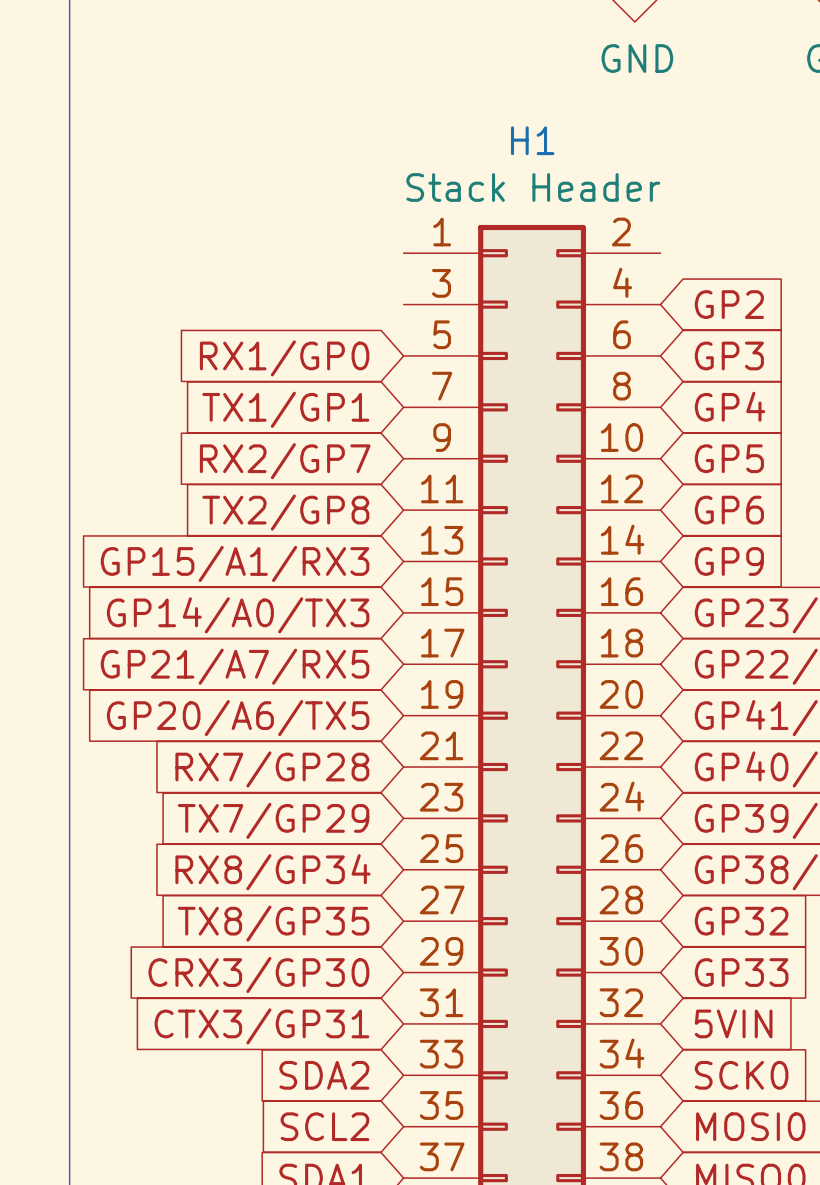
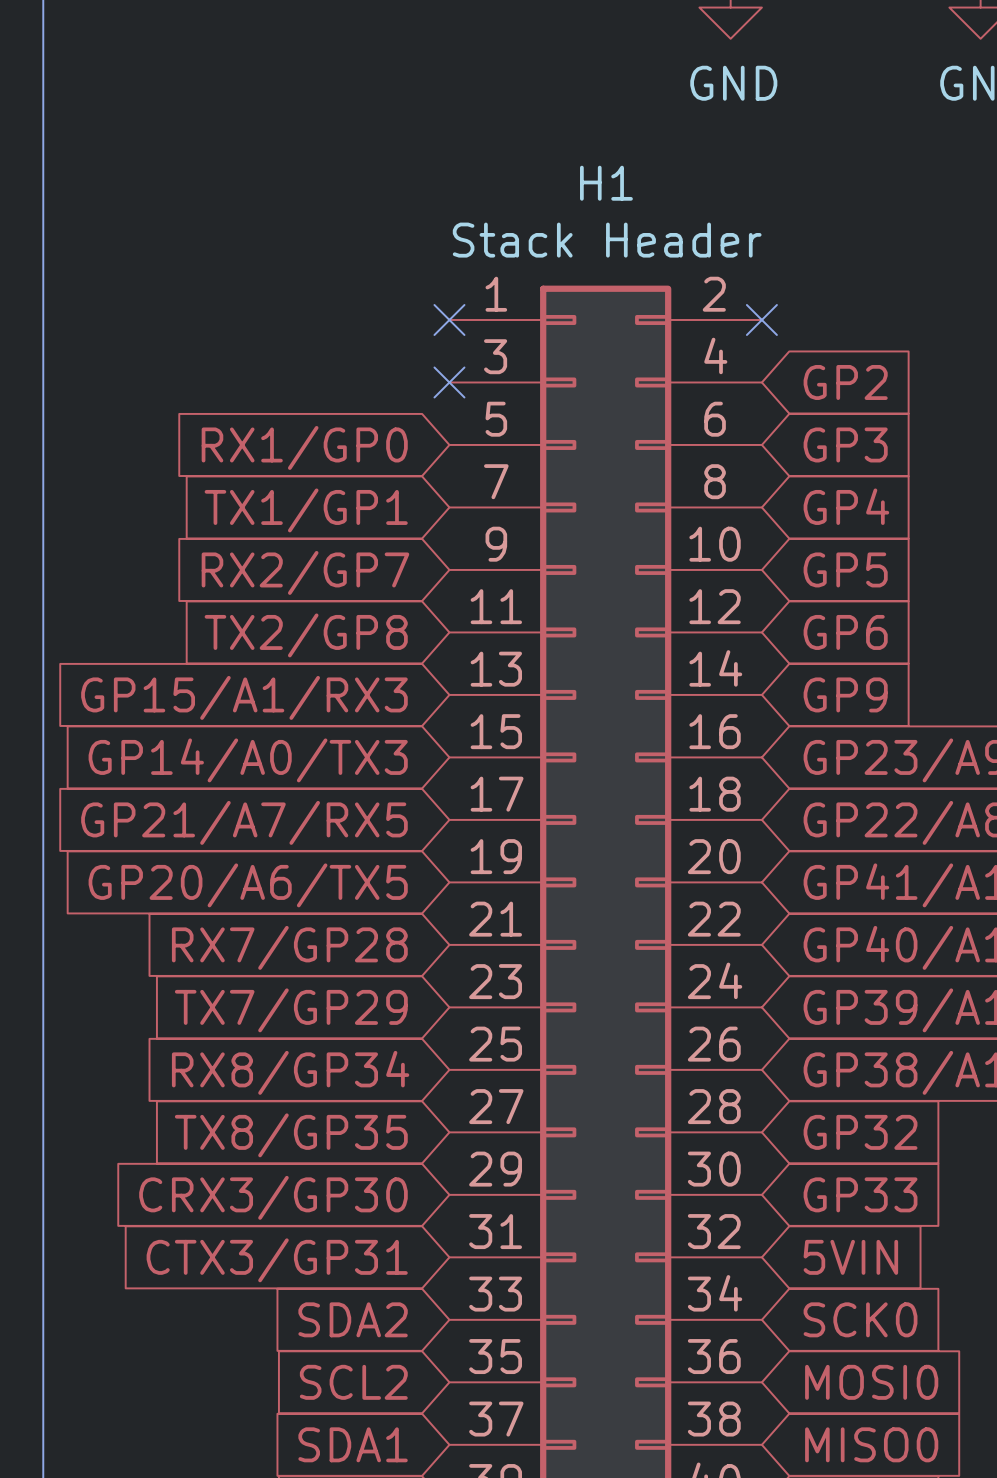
no-connect mark: none -> (449, 319)
no-connect mark: none -> (761, 319)
no-connect mark: none -> (449, 382)

